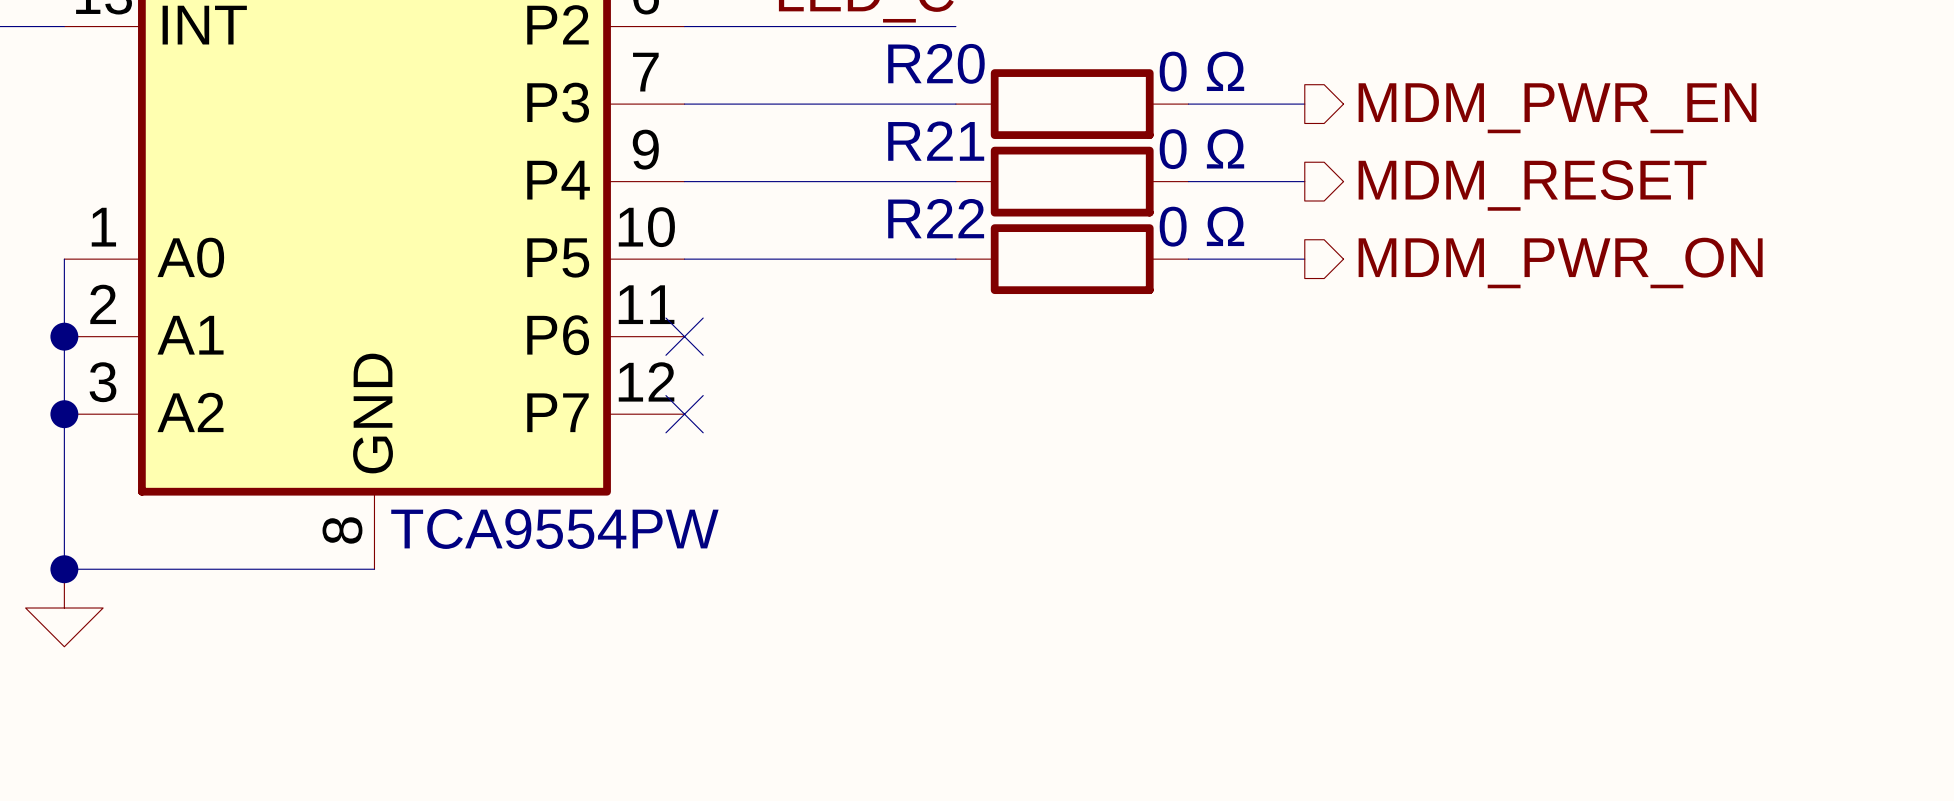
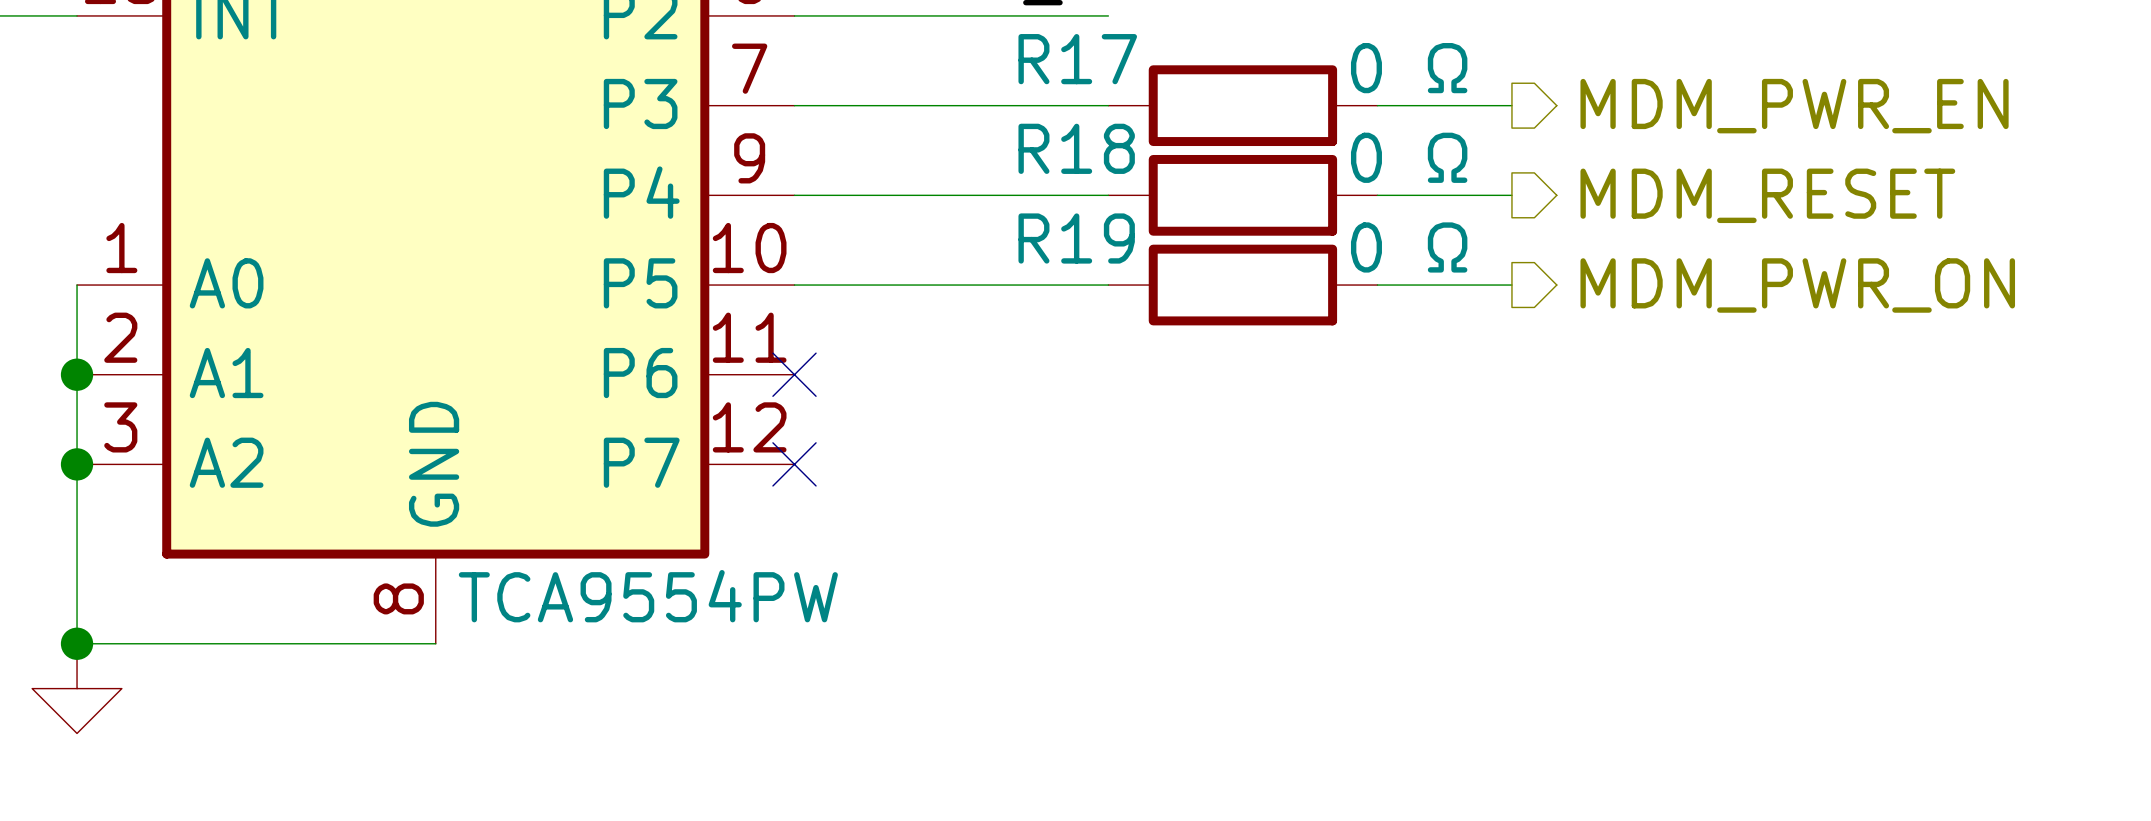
R20 name: R20 (936, 63) -> R17 (1077, 59)
R21 name: R21 (936, 141) -> R18 (1076, 148)
R22 name: R22 (936, 218) -> R19 (1076, 238)

